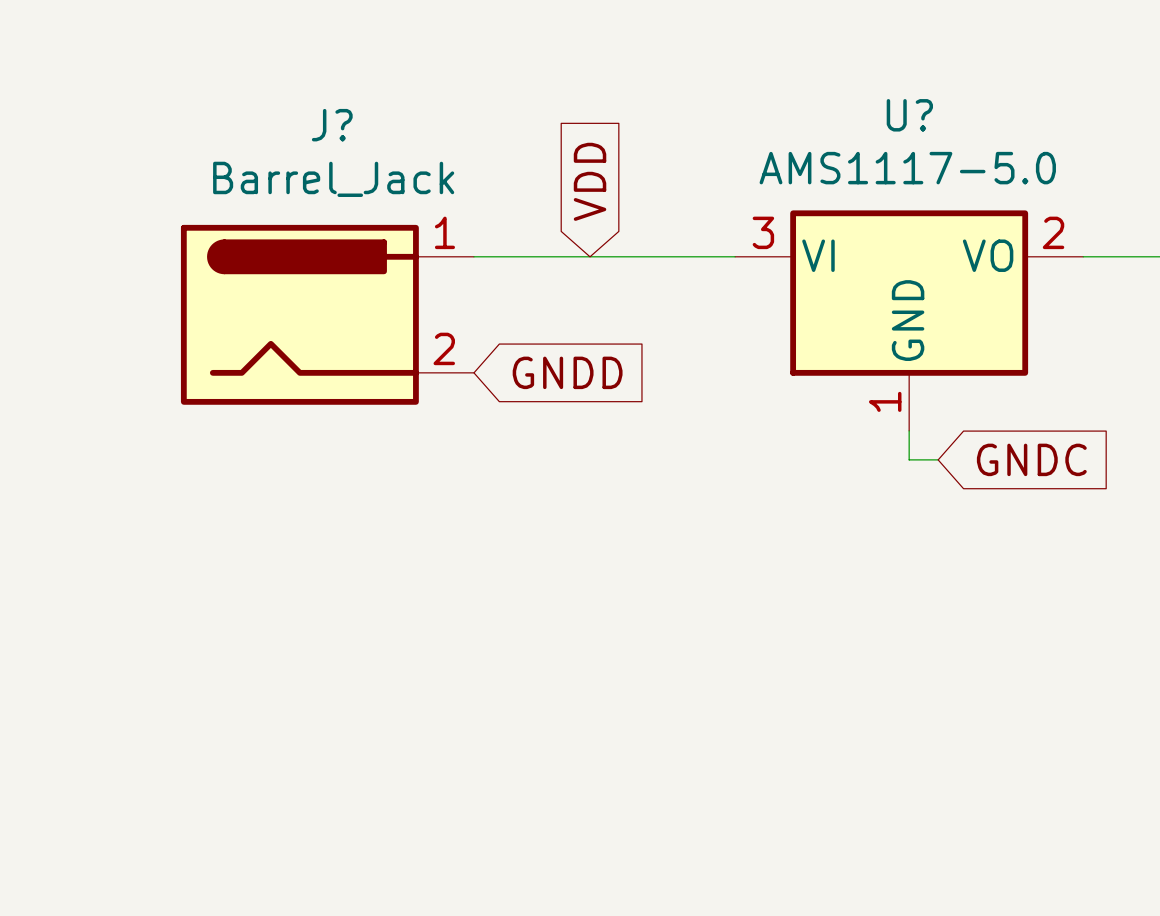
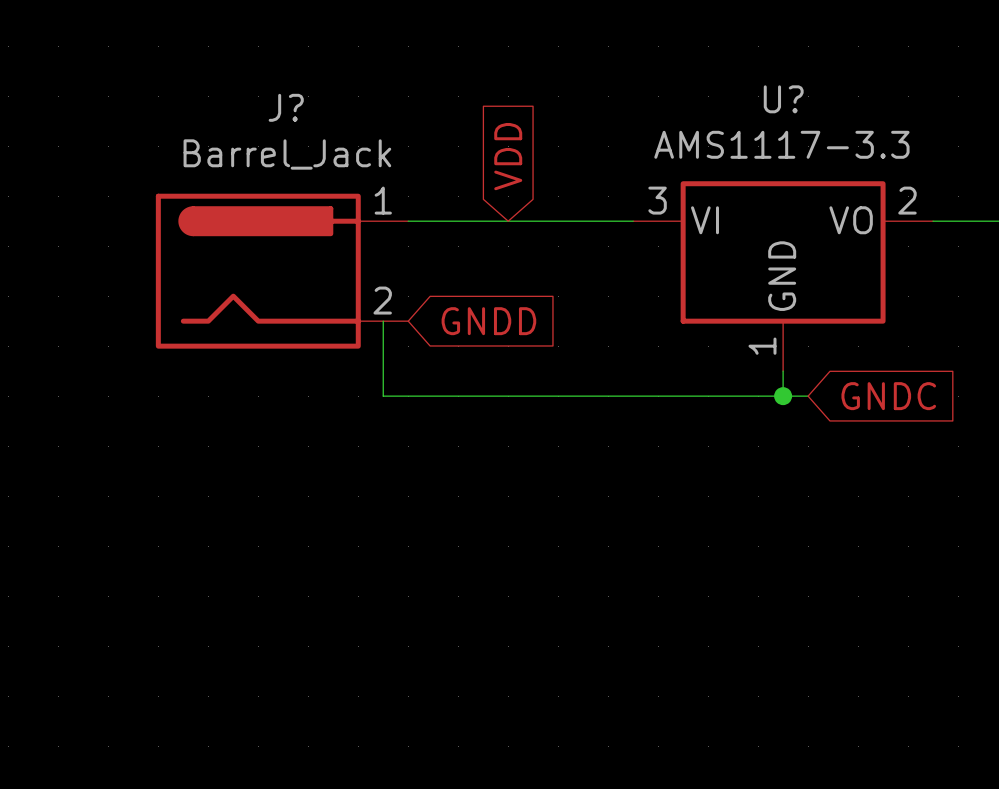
U? value: AMS1117-5.0 (907, 168) -> AMS1117-3.3 (781, 144)
wire: none -> (383, 321) (383, 396) (783, 396)
junction: none -> (783, 396)

